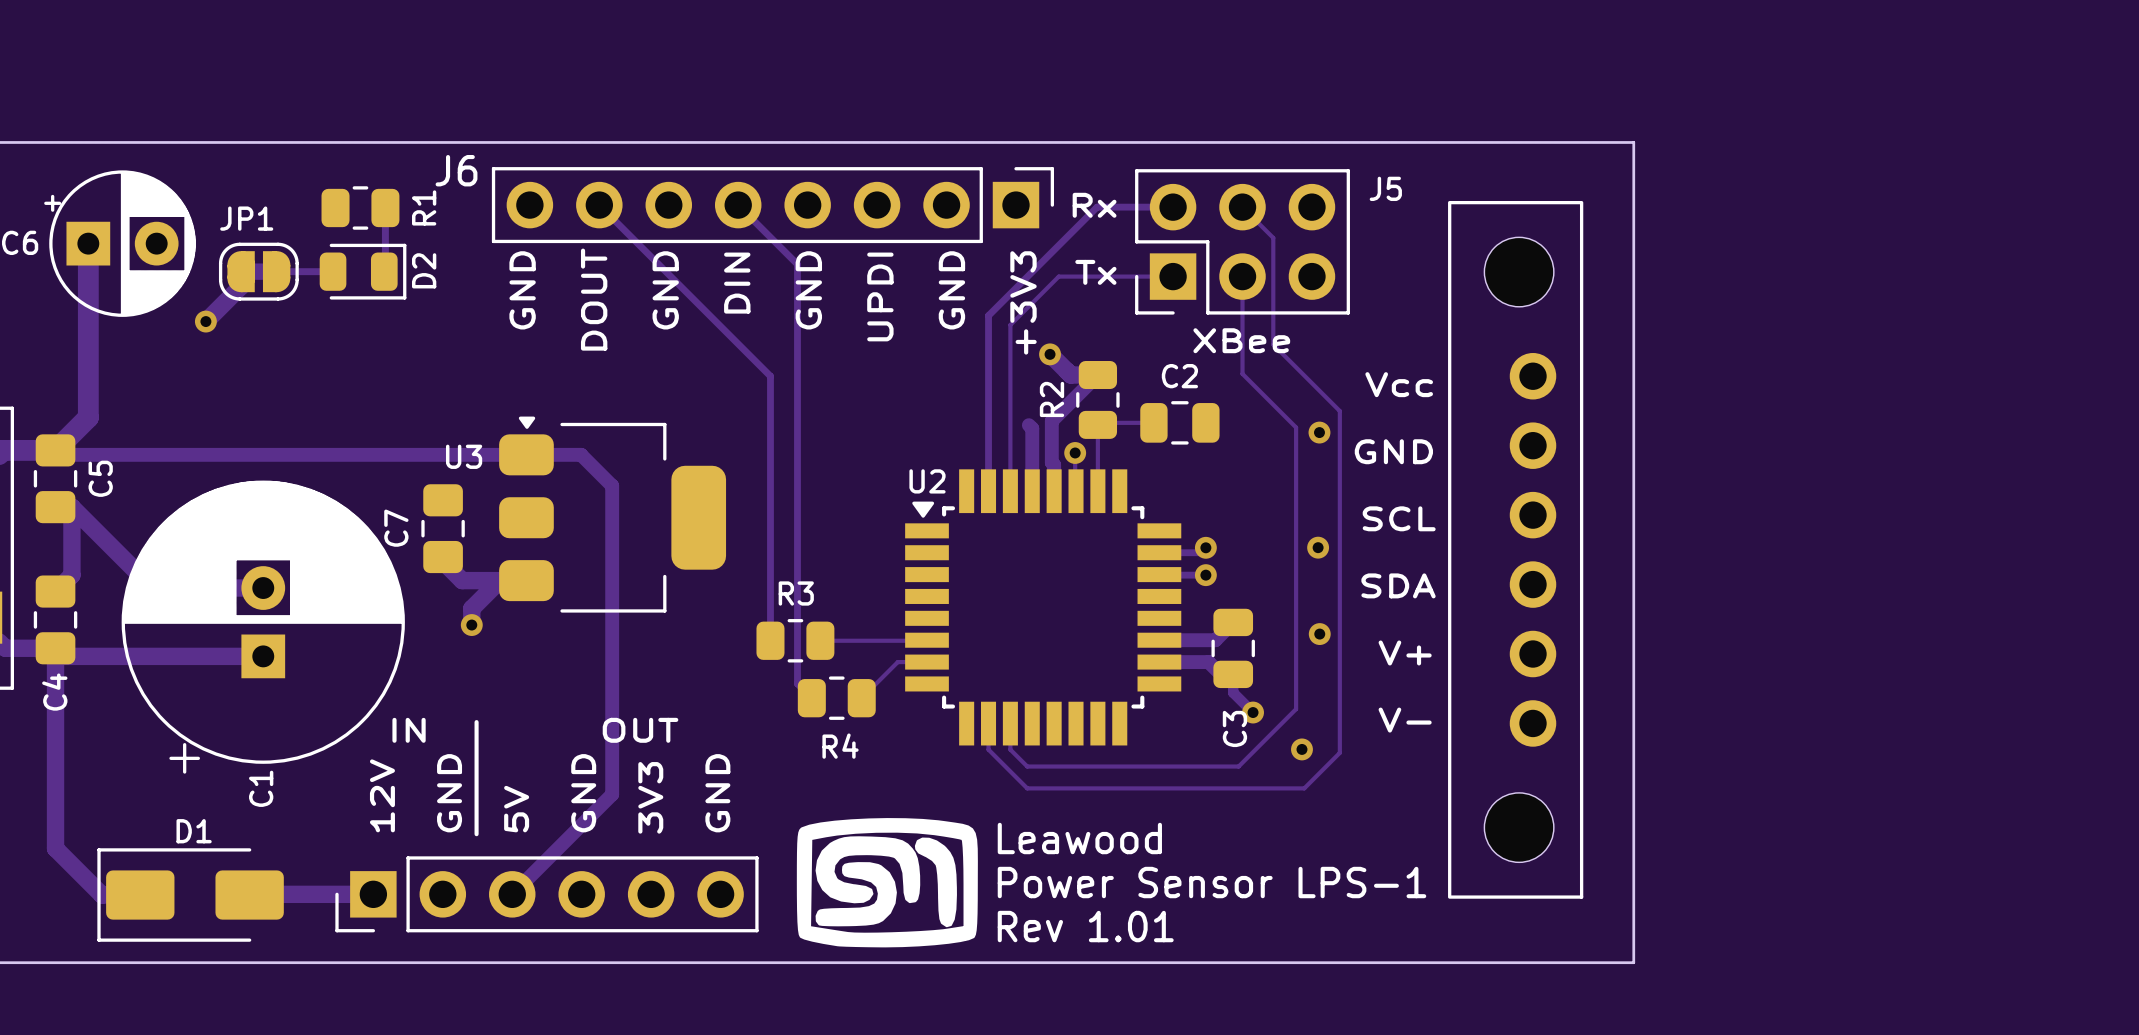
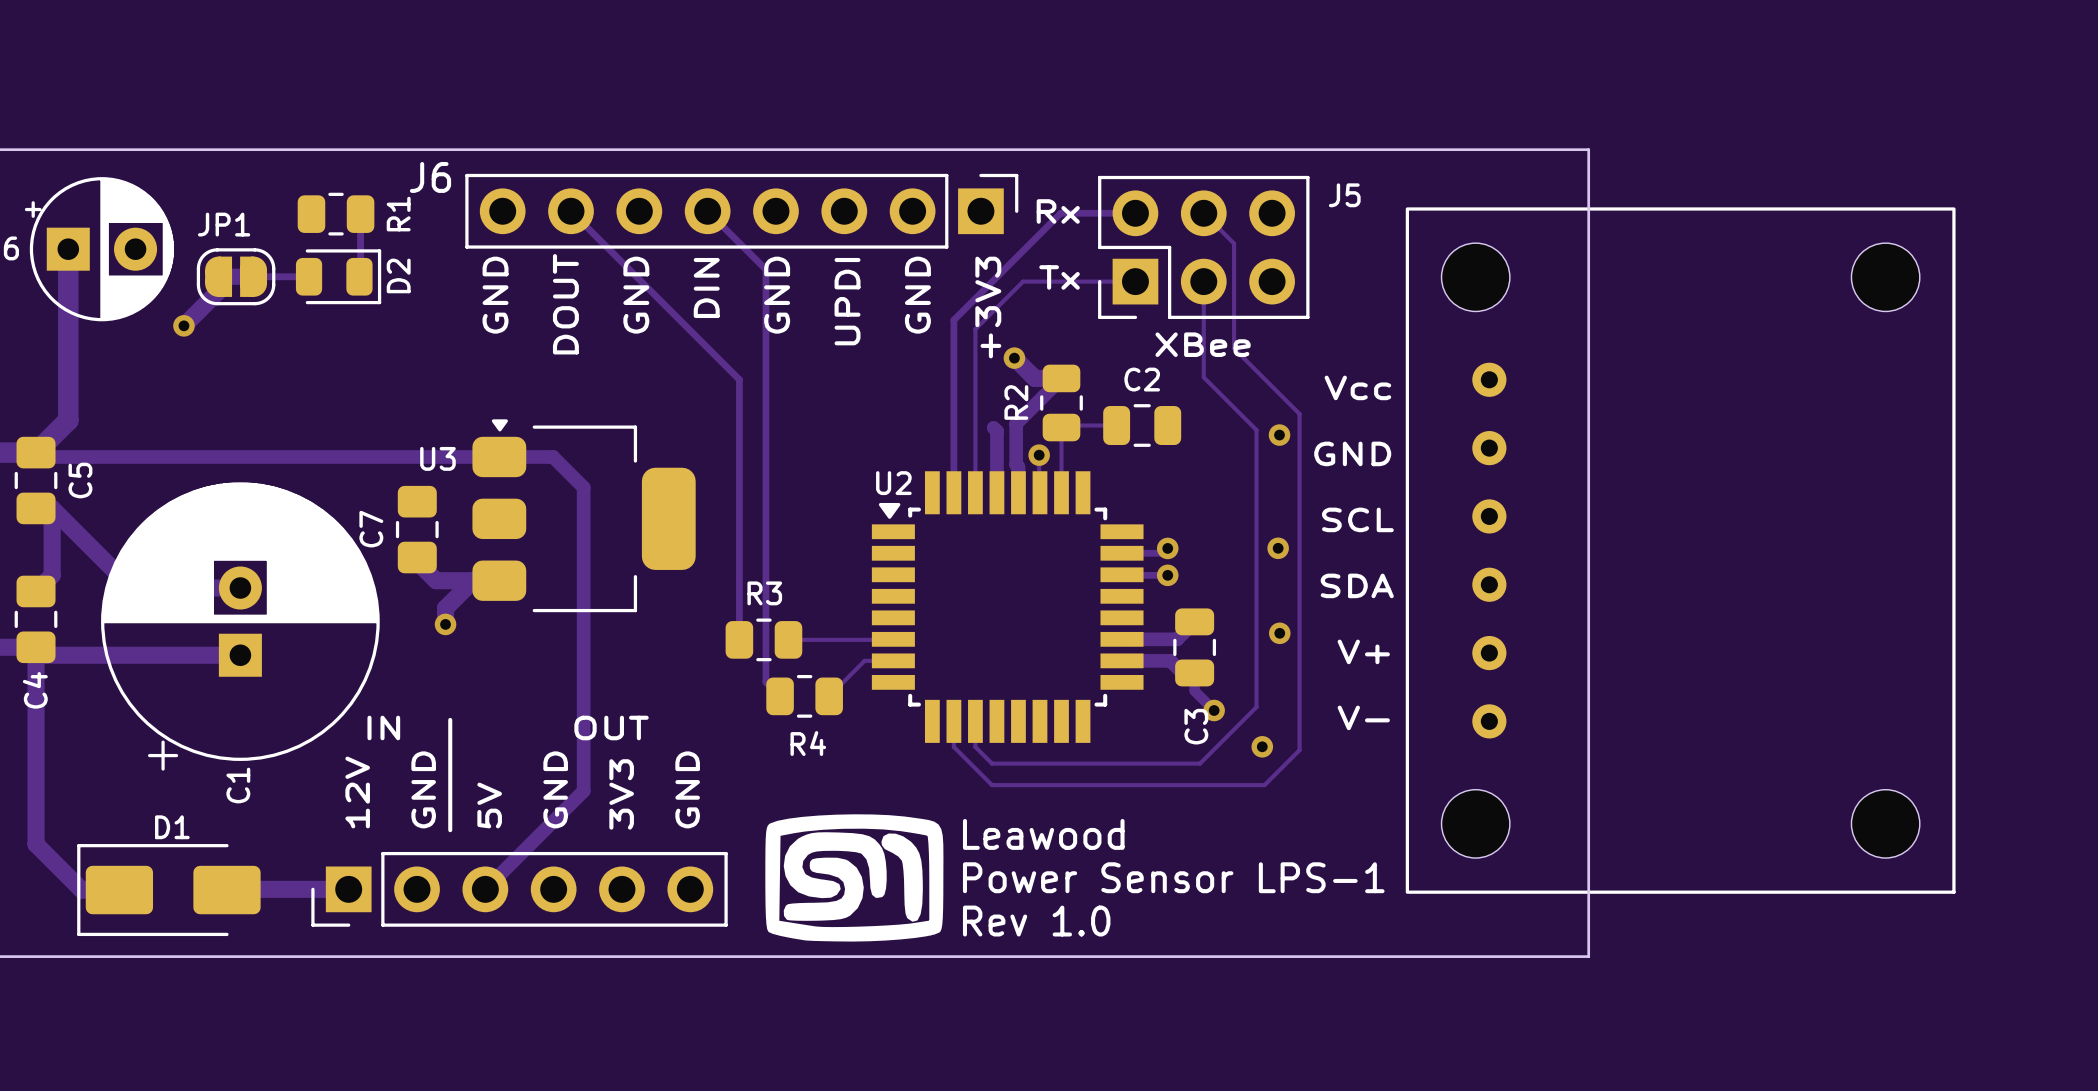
part: (1515, 549) -> none
part: none -> (1680, 550)
text: Rev 1.01 (1085, 926) -> Rev 1.0 (1036, 921)

